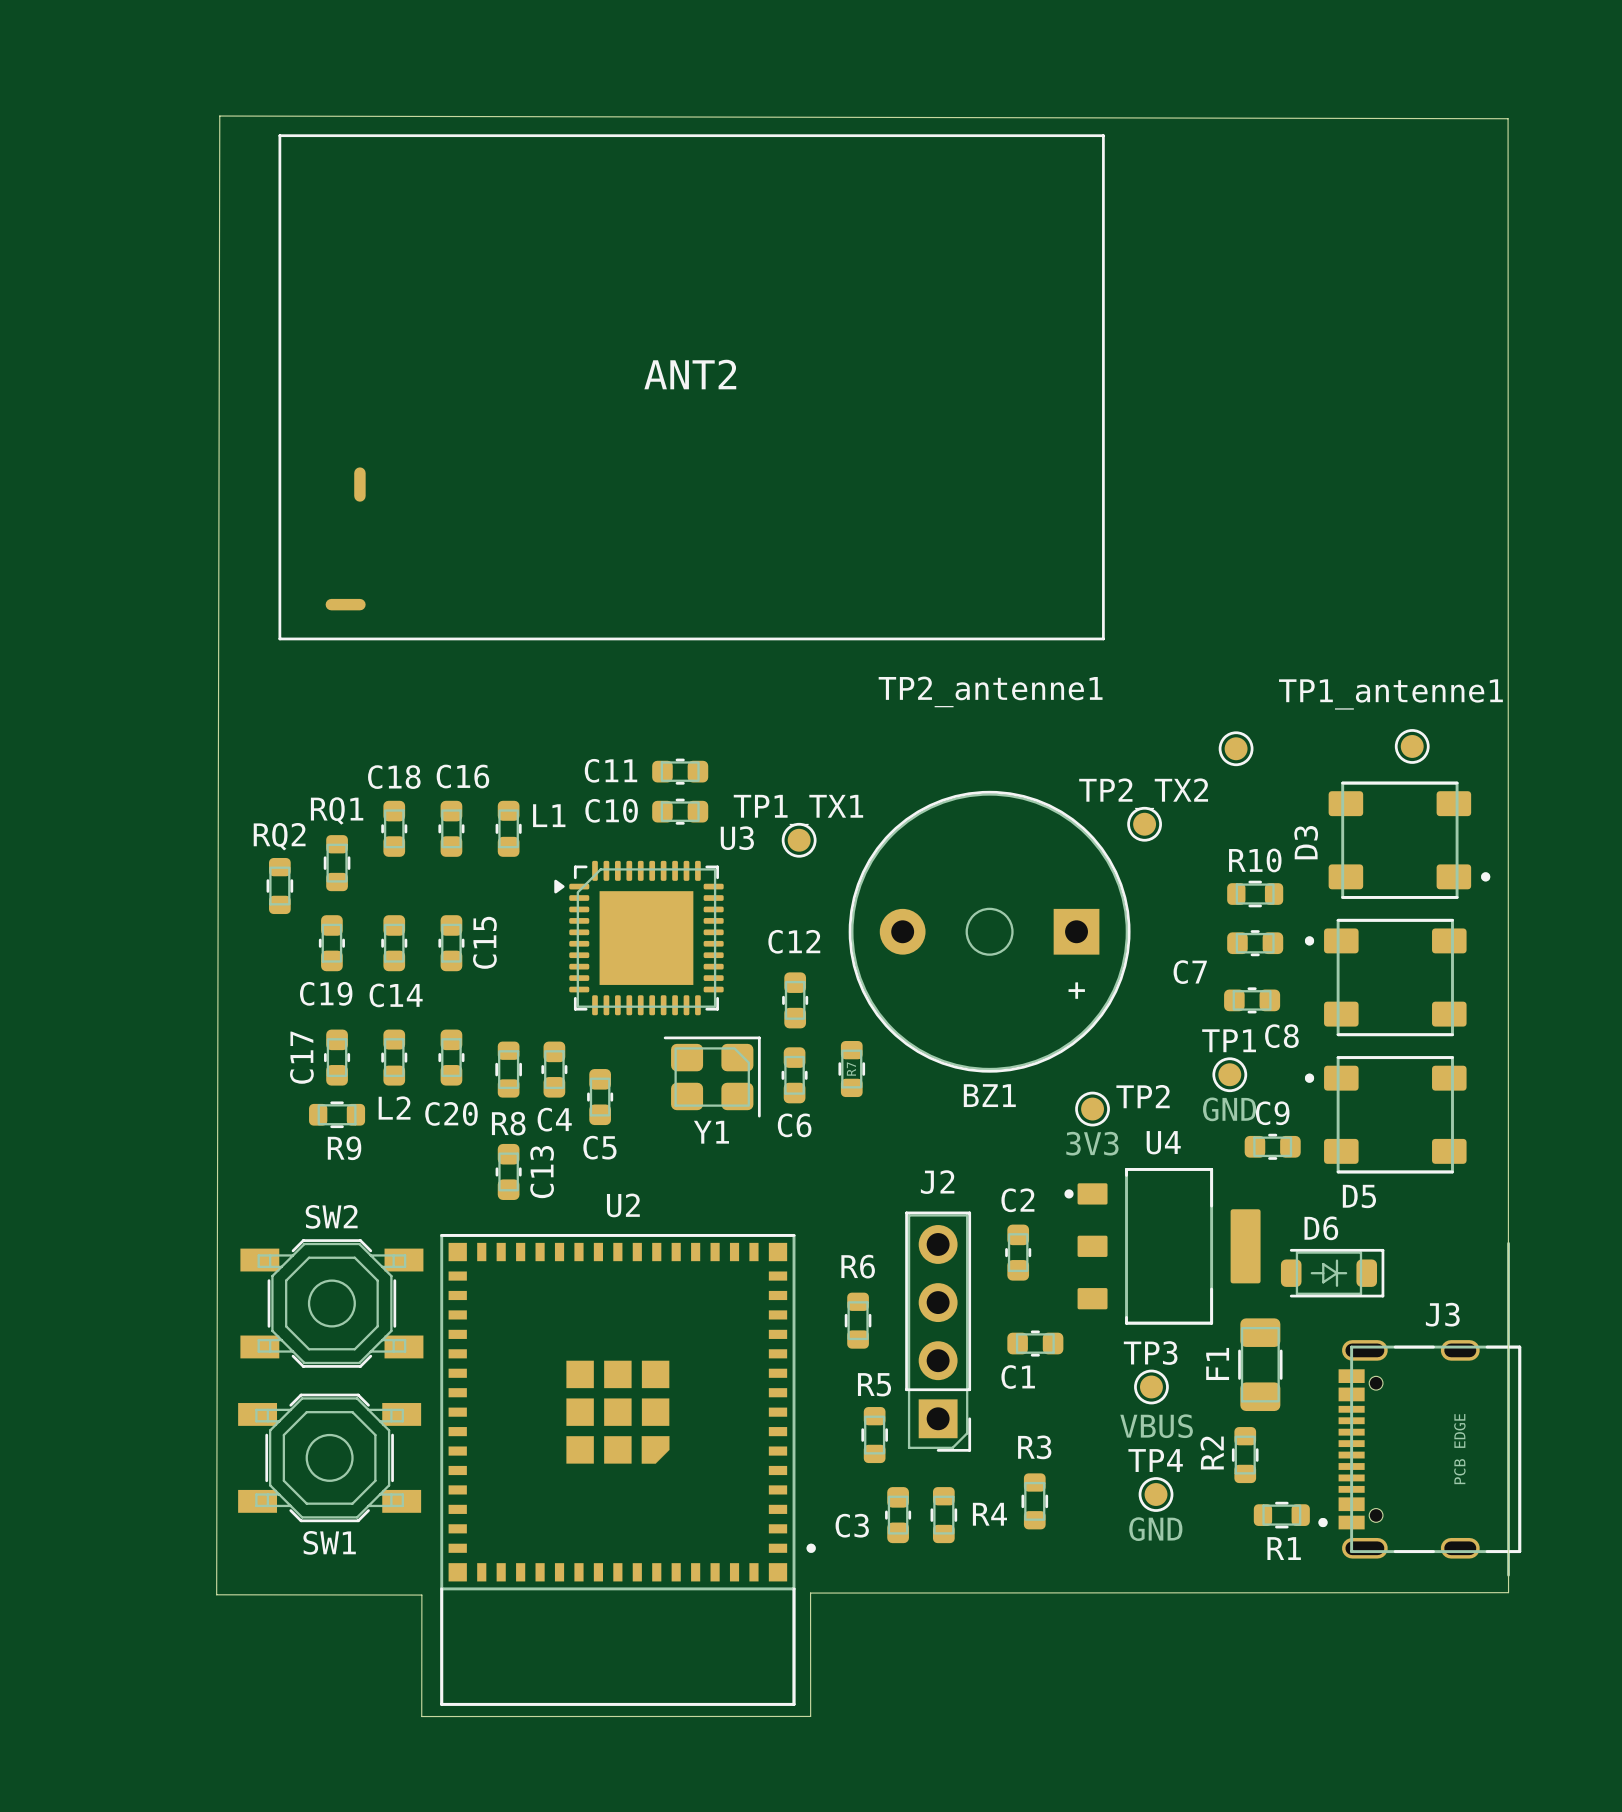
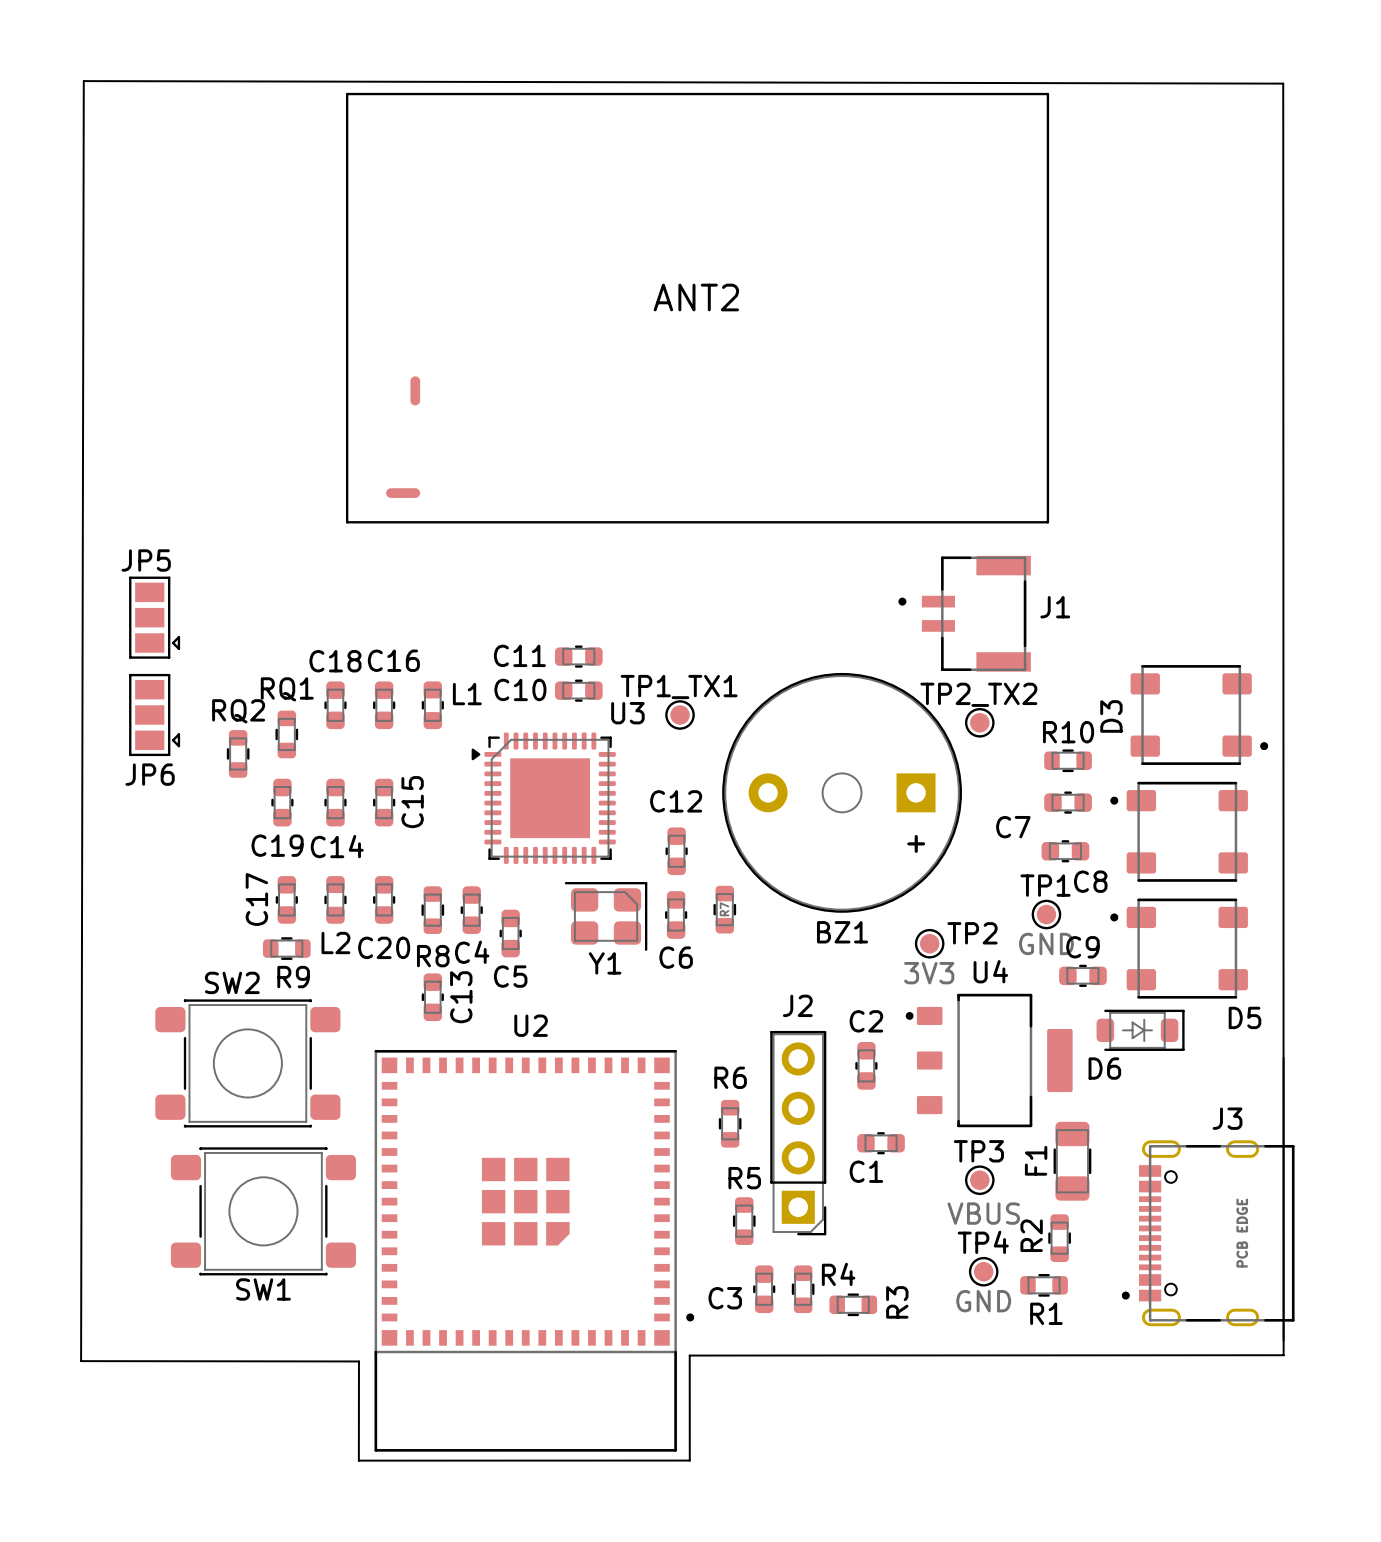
board edge: (1508, 118) (219, 116) (216, 1594) (421, 1595) (421, 1599) -> (1283, 101) (1283, 83) (83, 81) (81, 1361) (358, 1361)
ANT2 position: (691, 387) -> (697, 308)
J1: none -> (964, 613)
JP5: none -> (154, 617)
TP1_antenne1: (1412, 746) -> none
TP2_antenne1: (1236, 748) -> none
TP2_TX2 position: (1144, 824) -> (979, 722)
JP6: none -> (154, 714)
D5 name position: D5 (1359, 1196) -> D5 (1244, 1017)
D6 name position: D6 (1321, 1228) -> D6 (1104, 1068)
SW2 footprint: [240, 1239, 424, 1368] -> [155, 999, 341, 1128]
D6 position: (1332, 1273) -> (1140, 1030)
SW1 footprint: [238, 1393, 422, 1523] -> [170, 1147, 357, 1276]
R3 rotation: 0° (1034, 1501) -> 90° clockwise (853, 1304)
R3 position: (1034, 1501) -> (853, 1304)
R4 name position: R4 (989, 1514) -> R4 (838, 1274)
R1 position: (1281, 1515) -> (1044, 1285)

